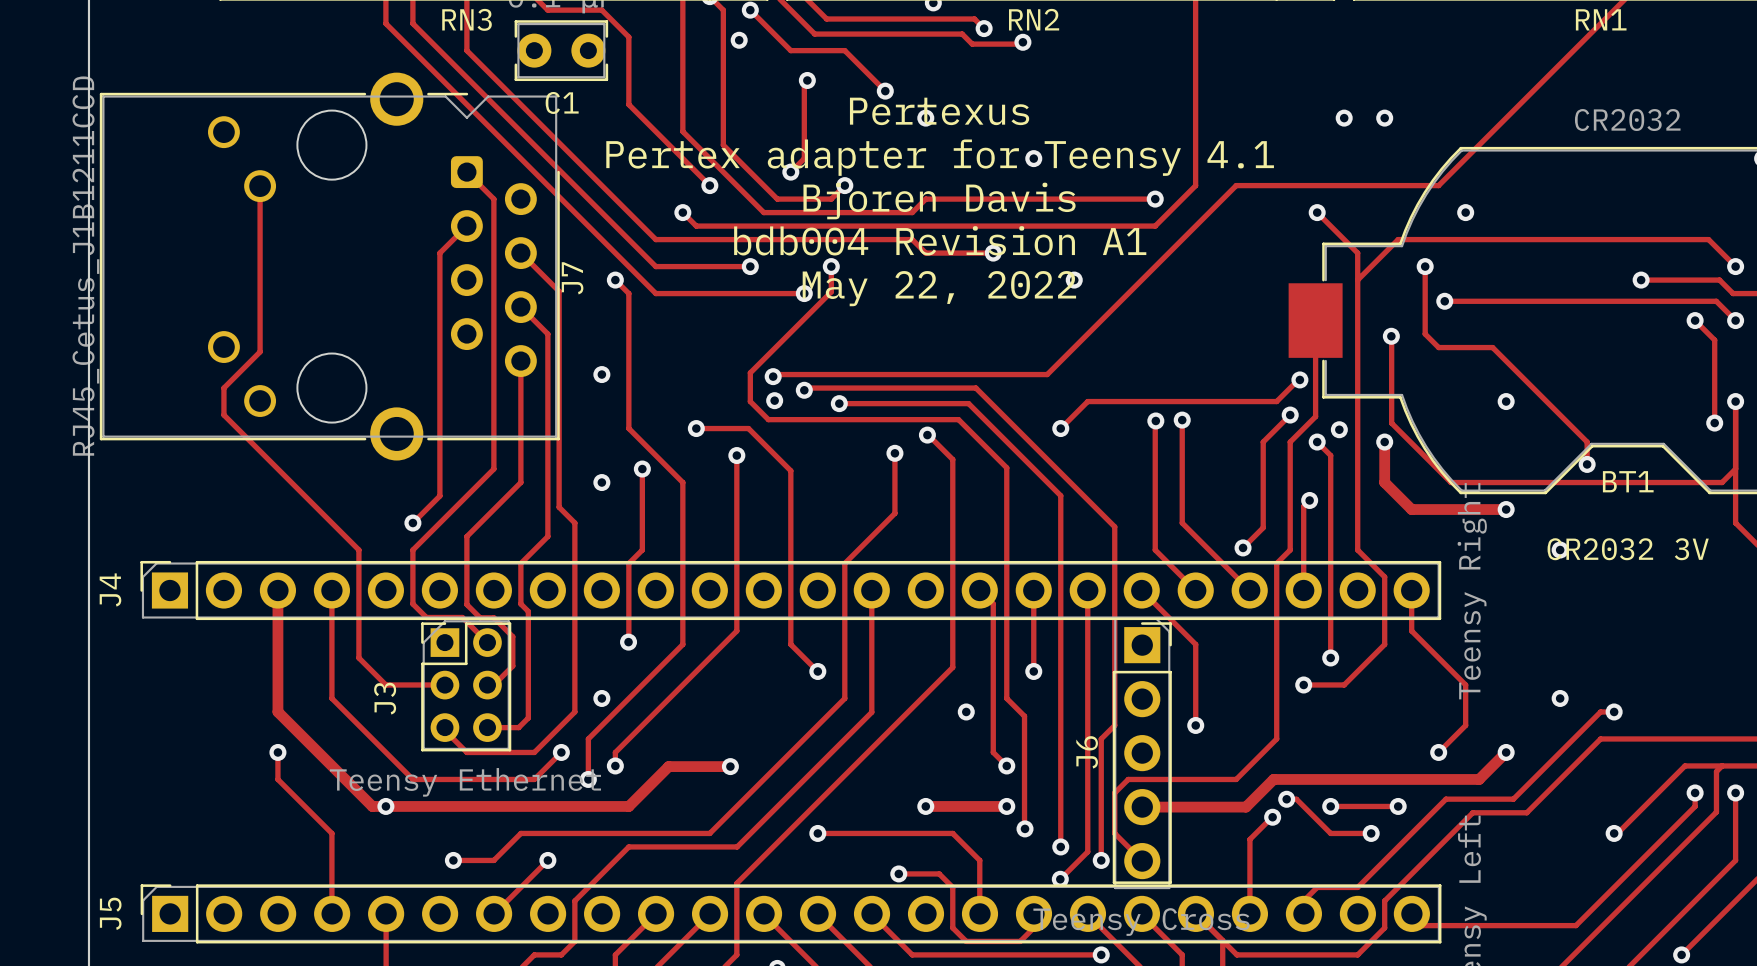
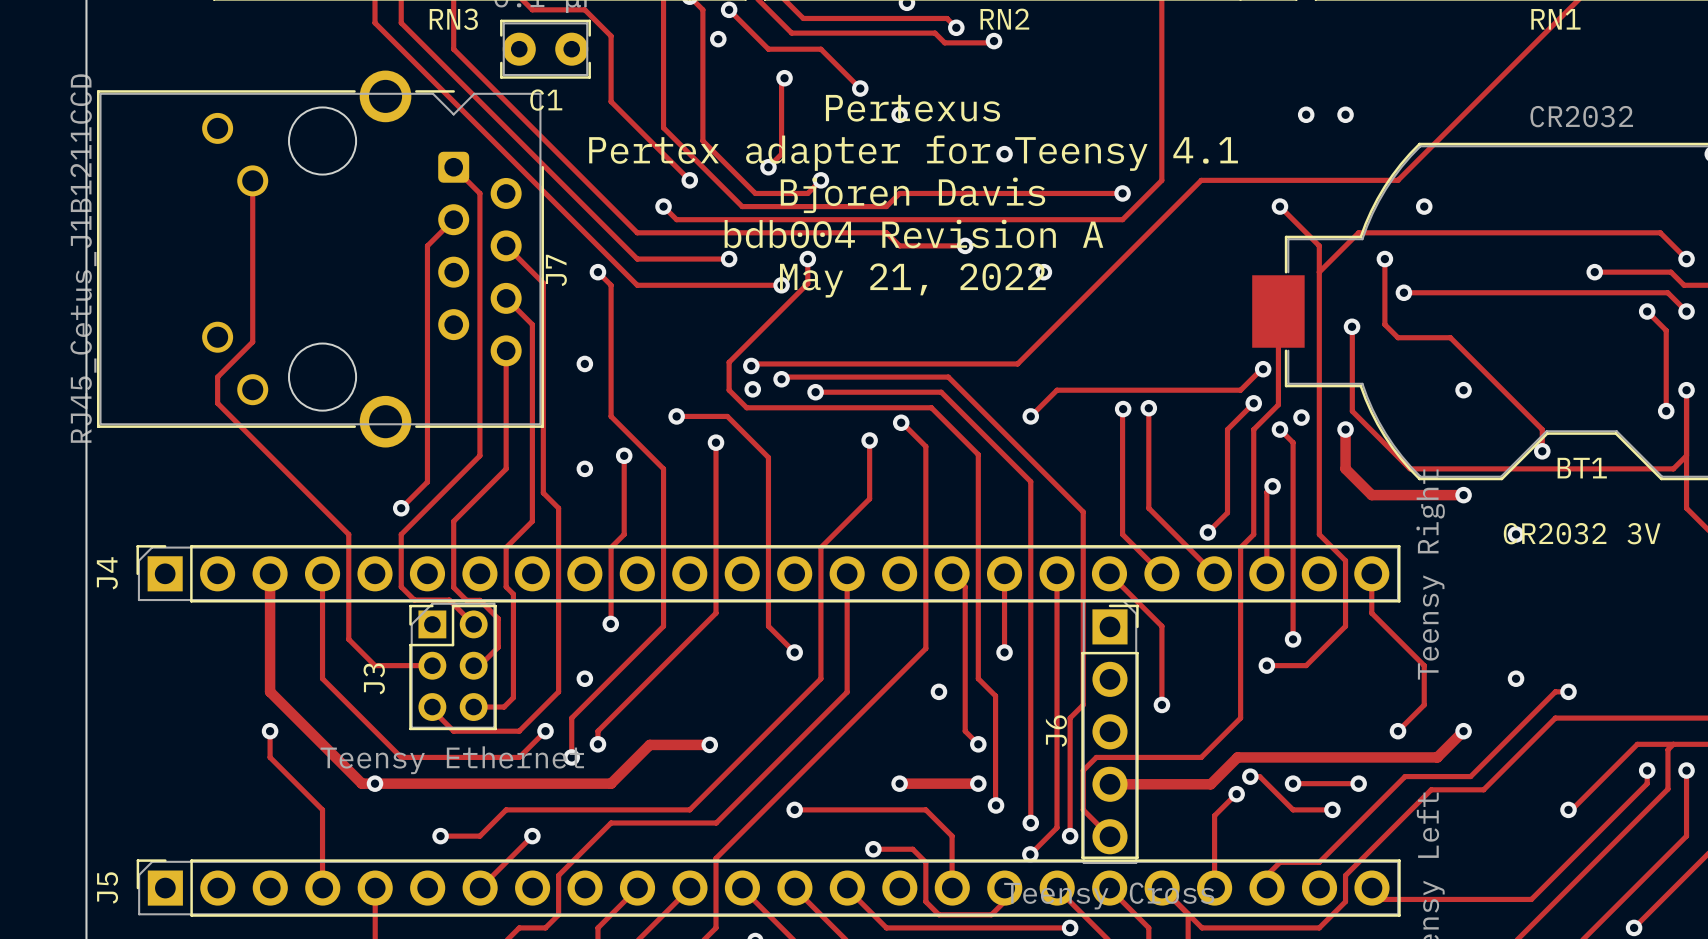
text: bdb004 Revision A1 (940, 240) -> bdb004 Revision A (913, 234)
text: May 22, 2022 (939, 288) -> May 21, 2022 (912, 280)

